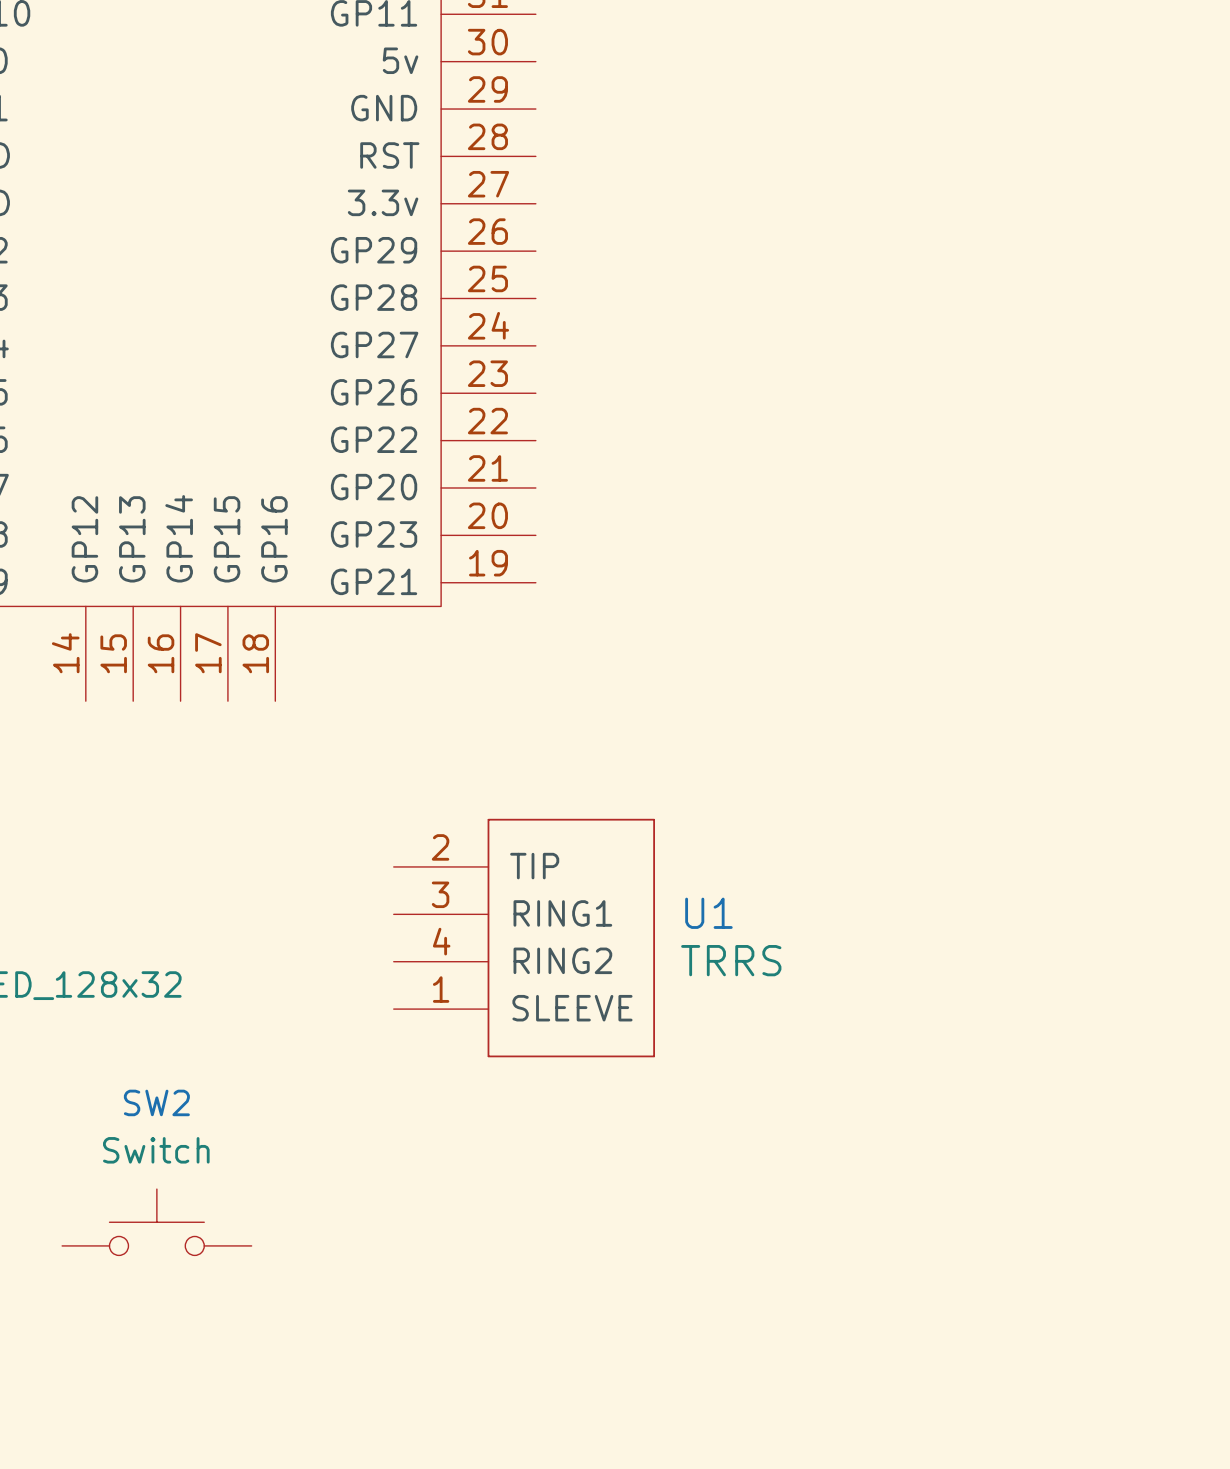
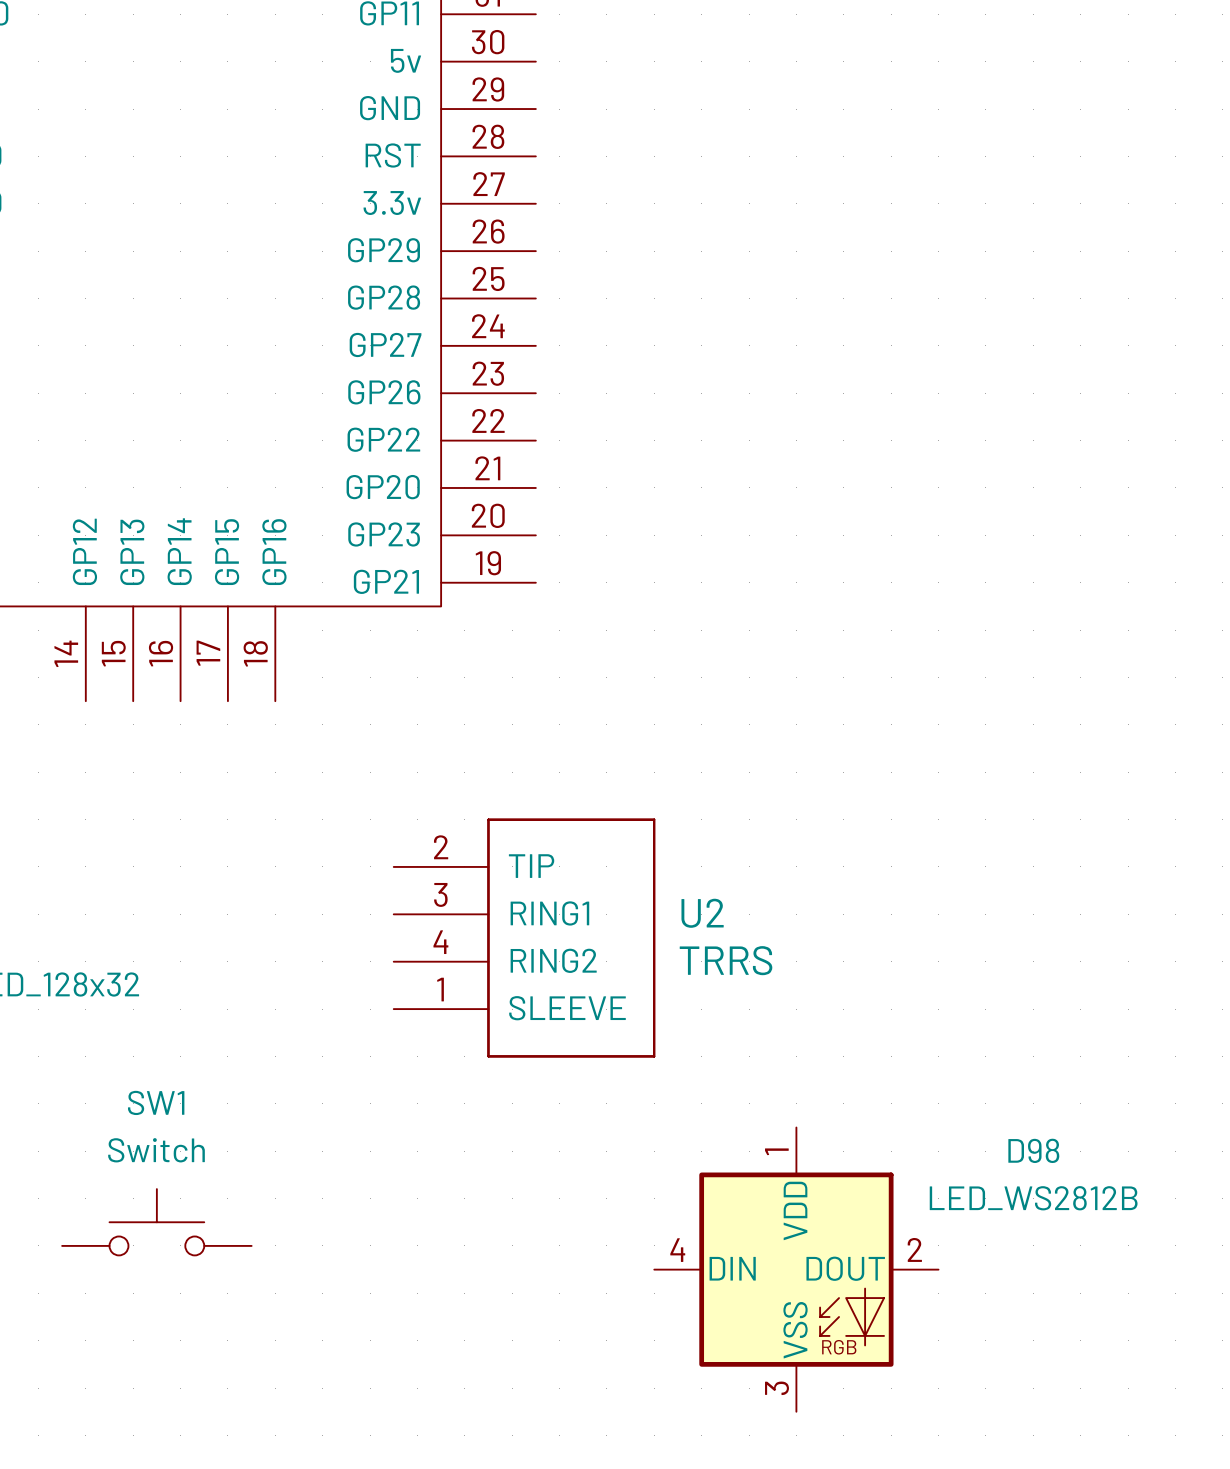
U1 name: U1 (708, 913) -> U2 (702, 913)
SW2 name: SW2 (156, 1102) -> SW1 (156, 1102)
D98: none -> LED_WS2812B (796, 1269)

